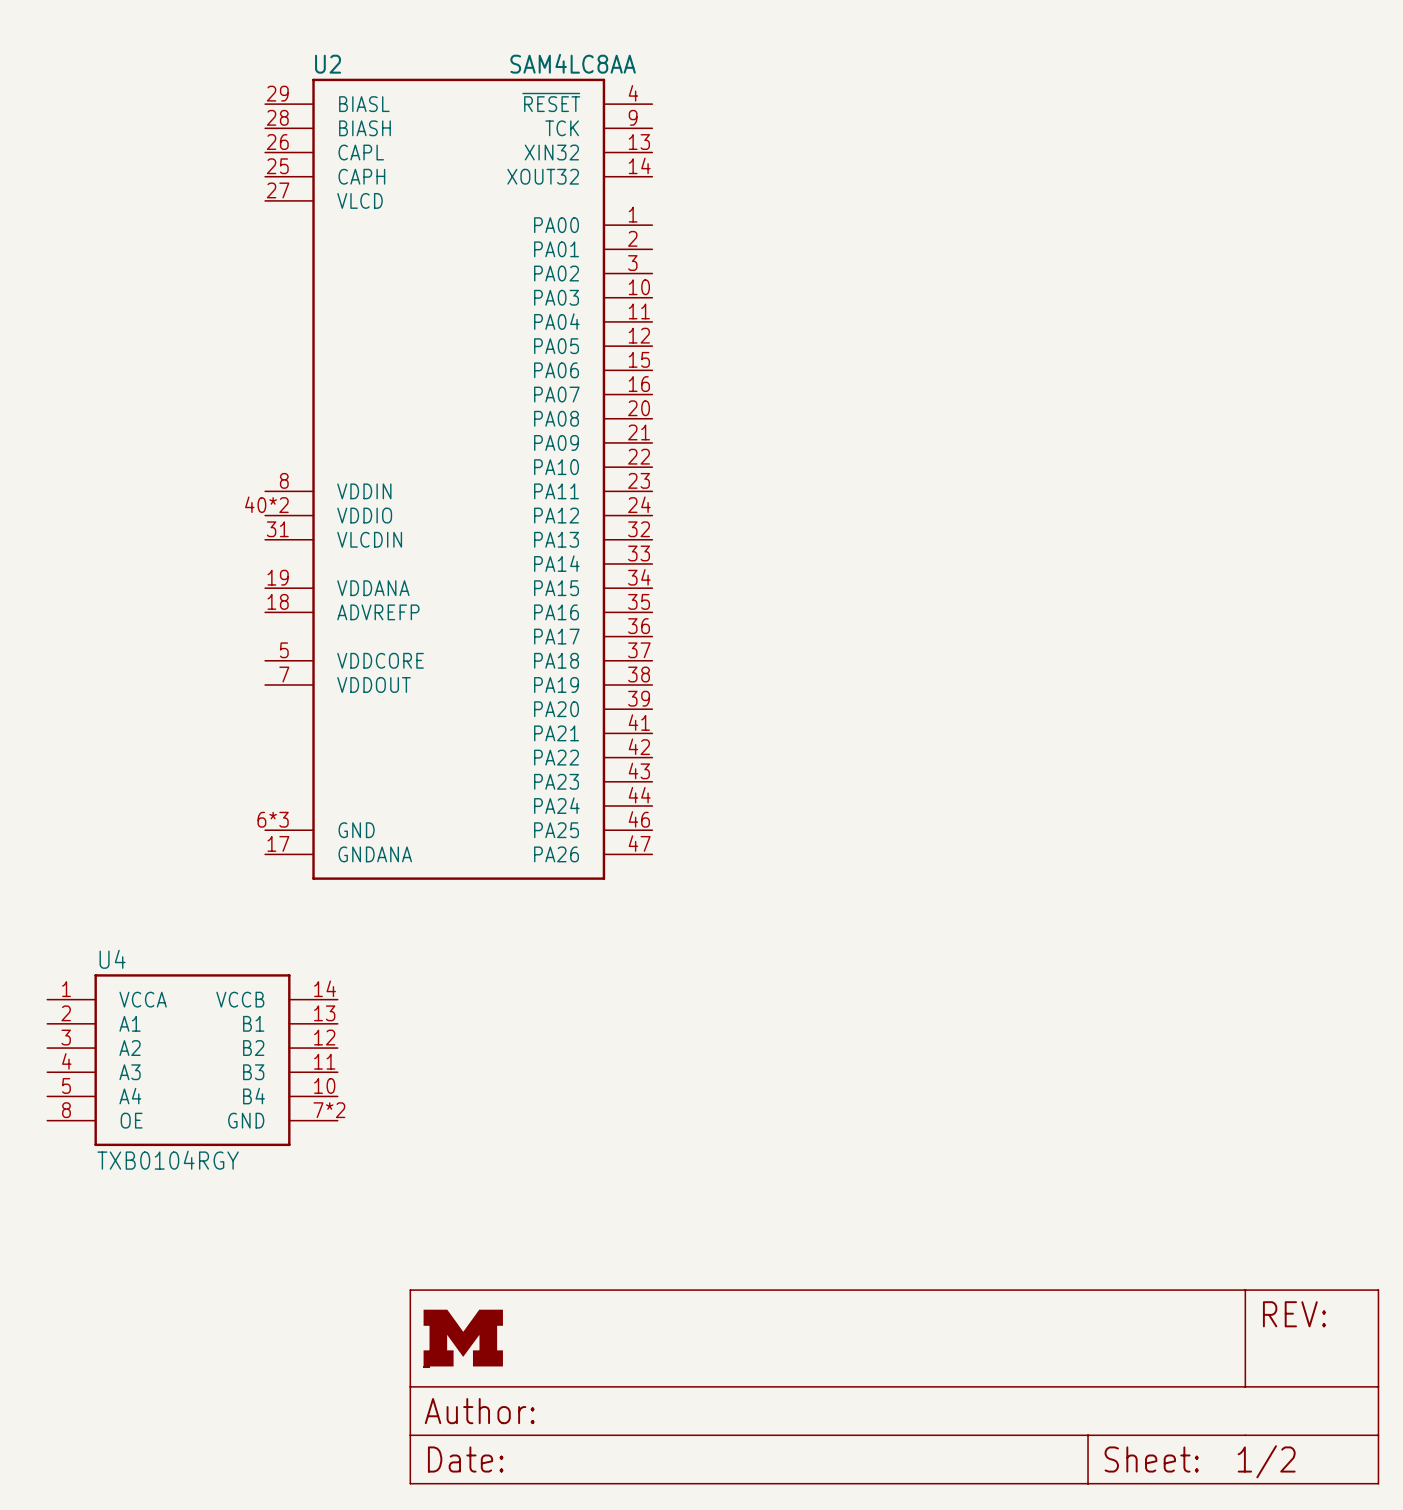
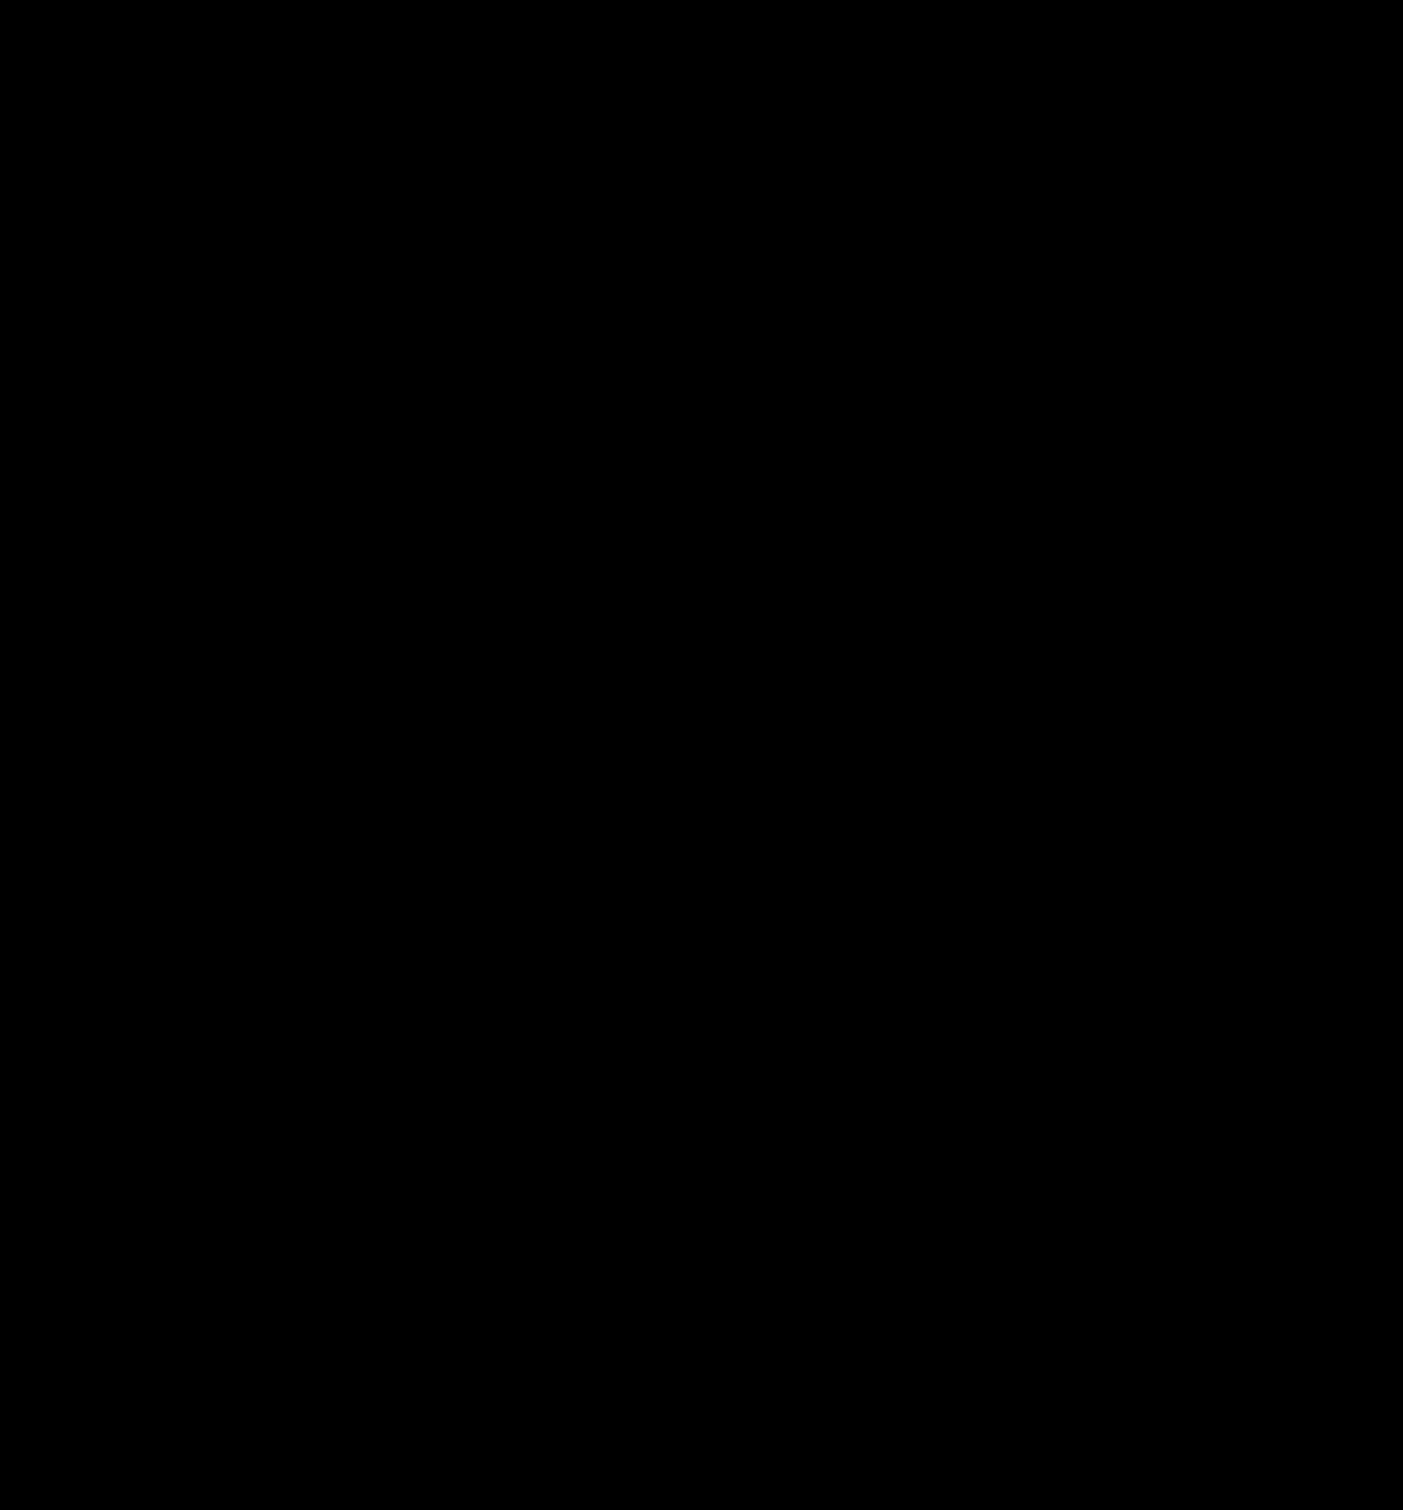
U2: SAM4LC8AA (458, 479) -> none
U4: TXB0104RGY (192, 1060) -> none
part: (894, 1386) -> none

